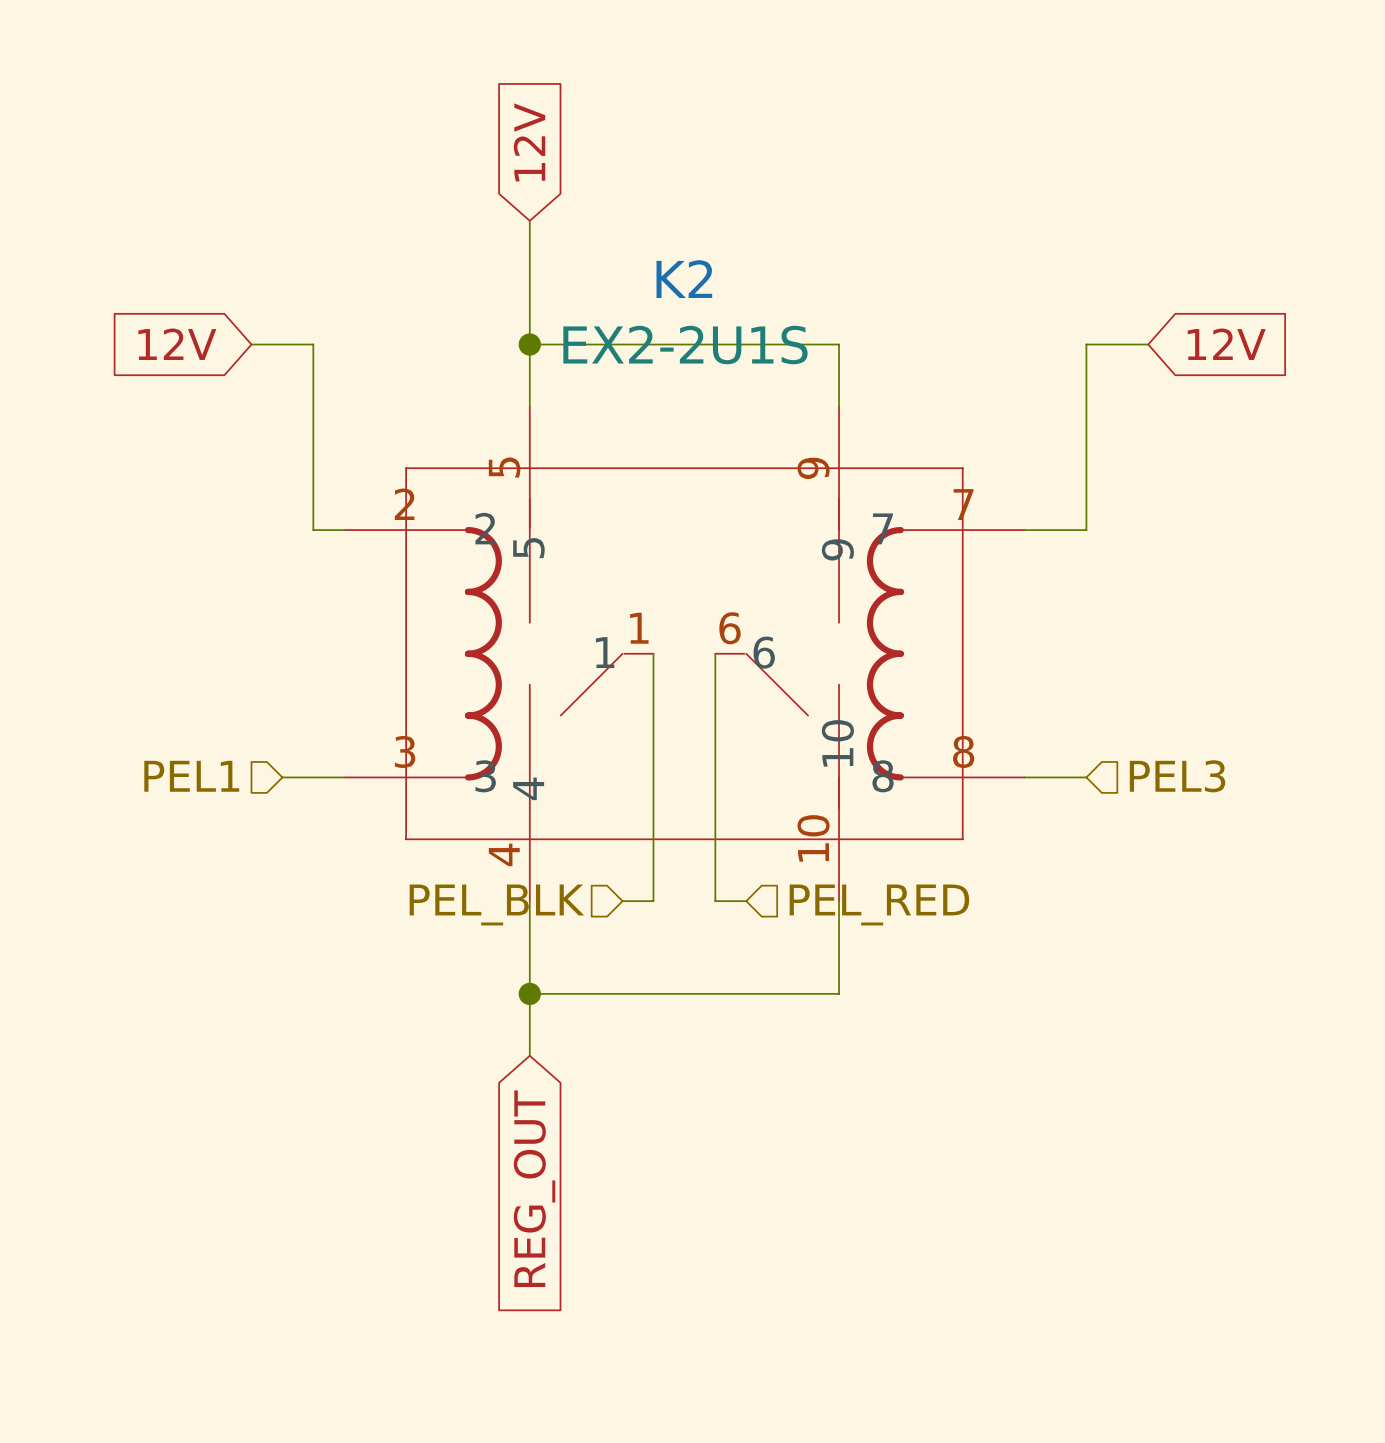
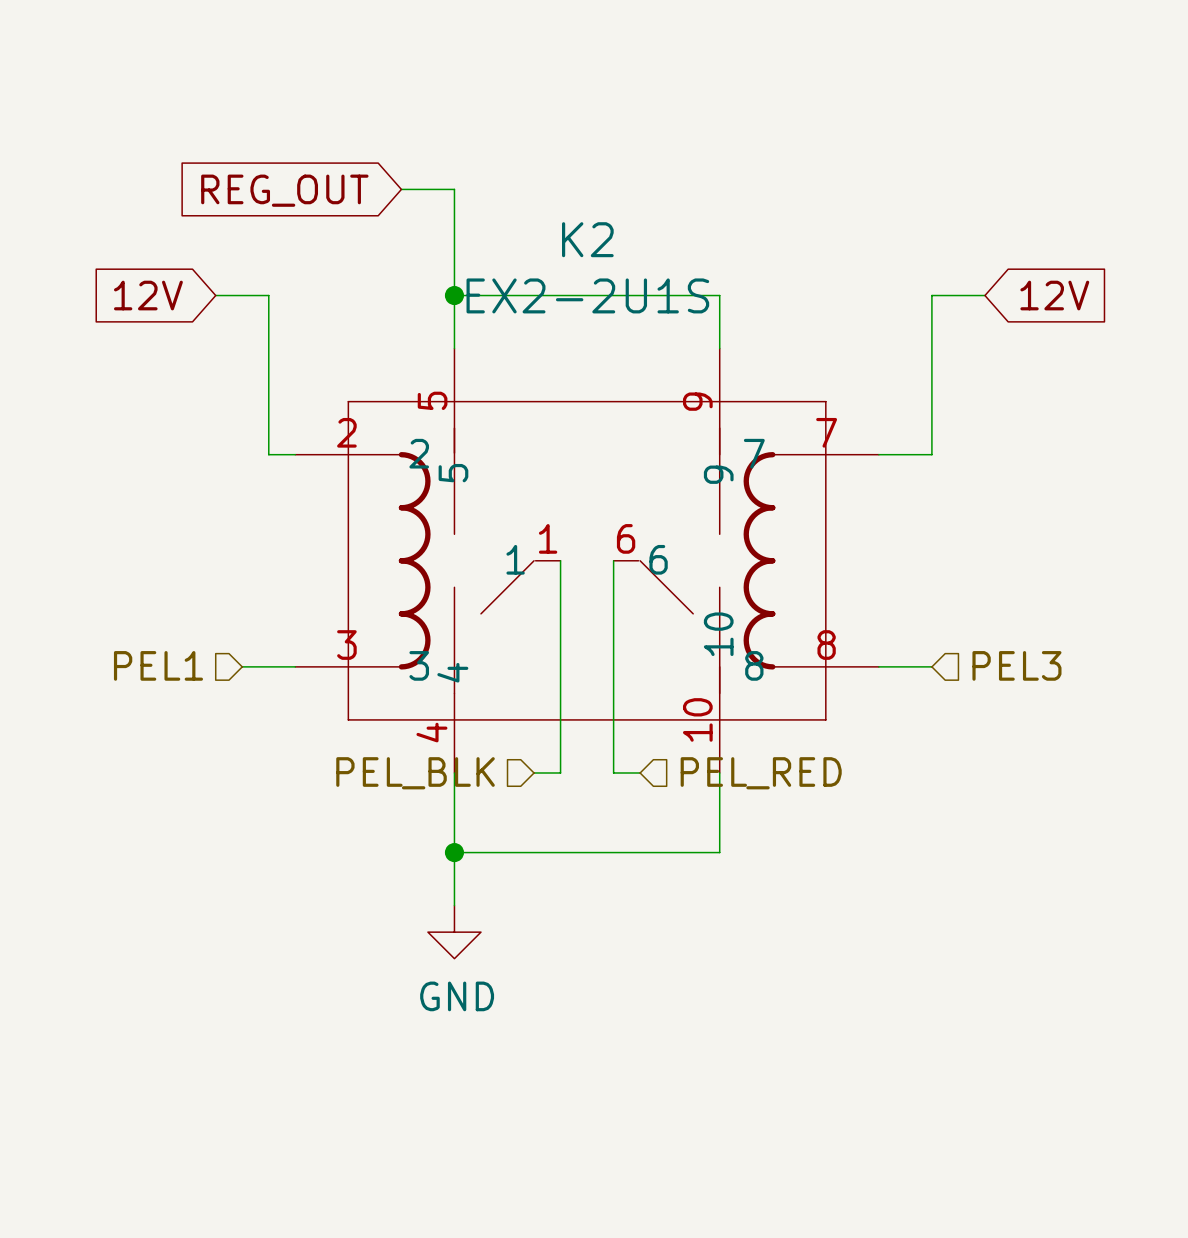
global label: 12V (529, 142) -> none
wire: none -> (401, 189) (454, 189)
global label: none -> REG_OUT (284, 190)
power symbol: none -> GND (454, 932)
global label: REG_OUT (534, 1188) -> none

